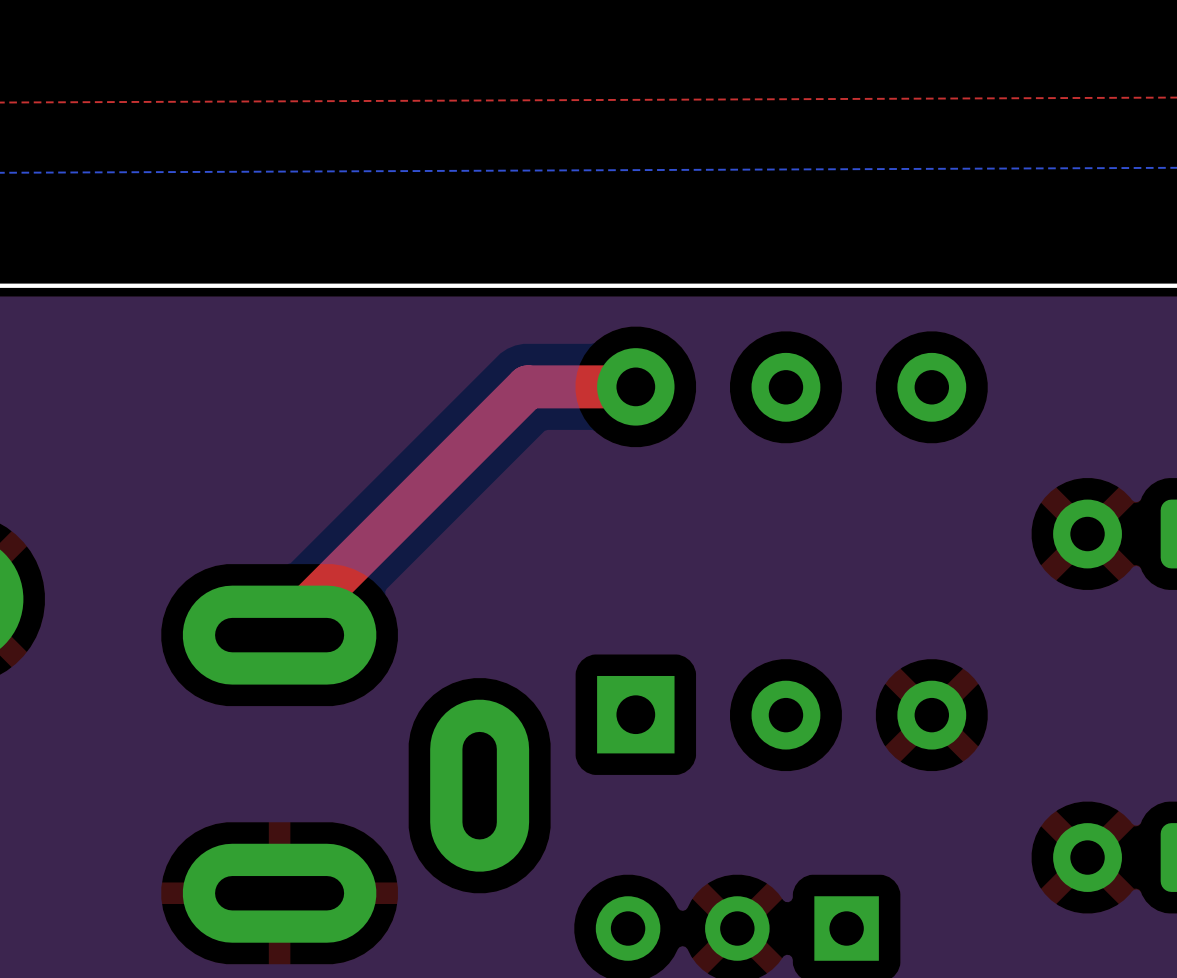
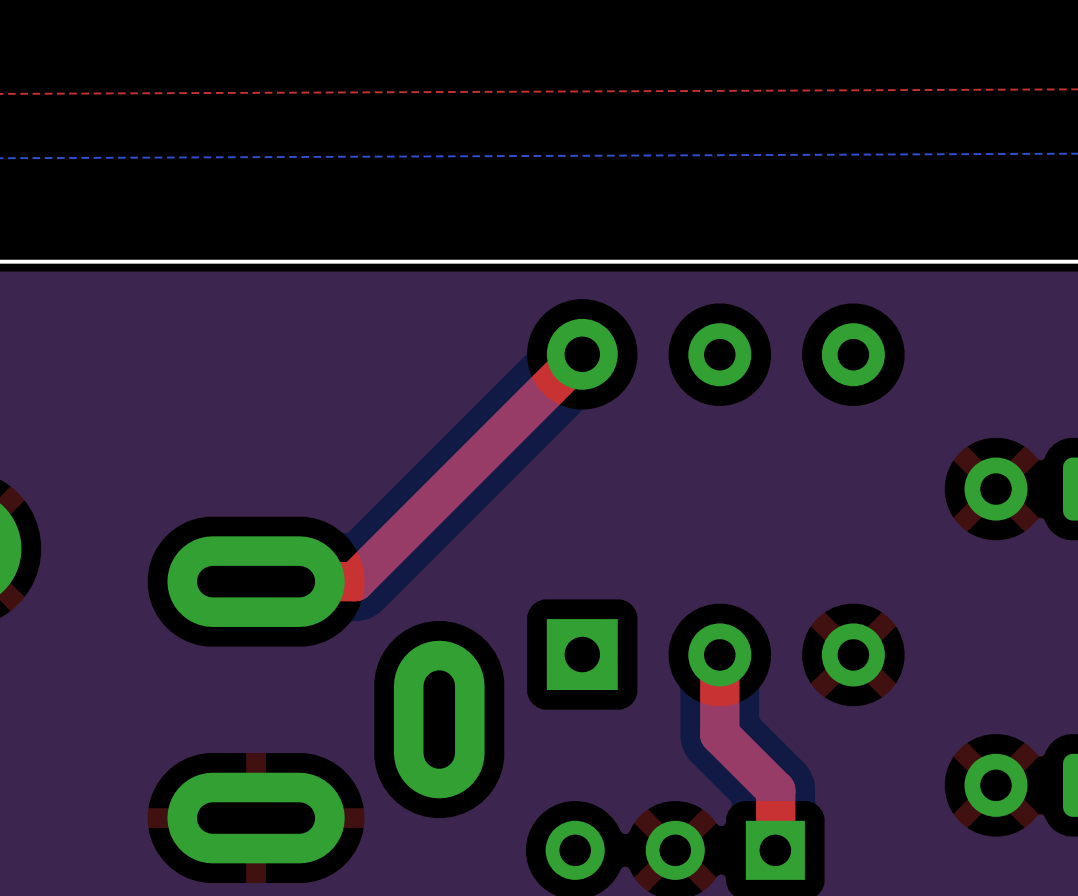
top track: (635, 386) (527, 386) (279, 635) -> (582, 354) (354, 581) (256, 581)
top track: none -> (719, 654) (719, 734) (775, 790) (775, 849)

